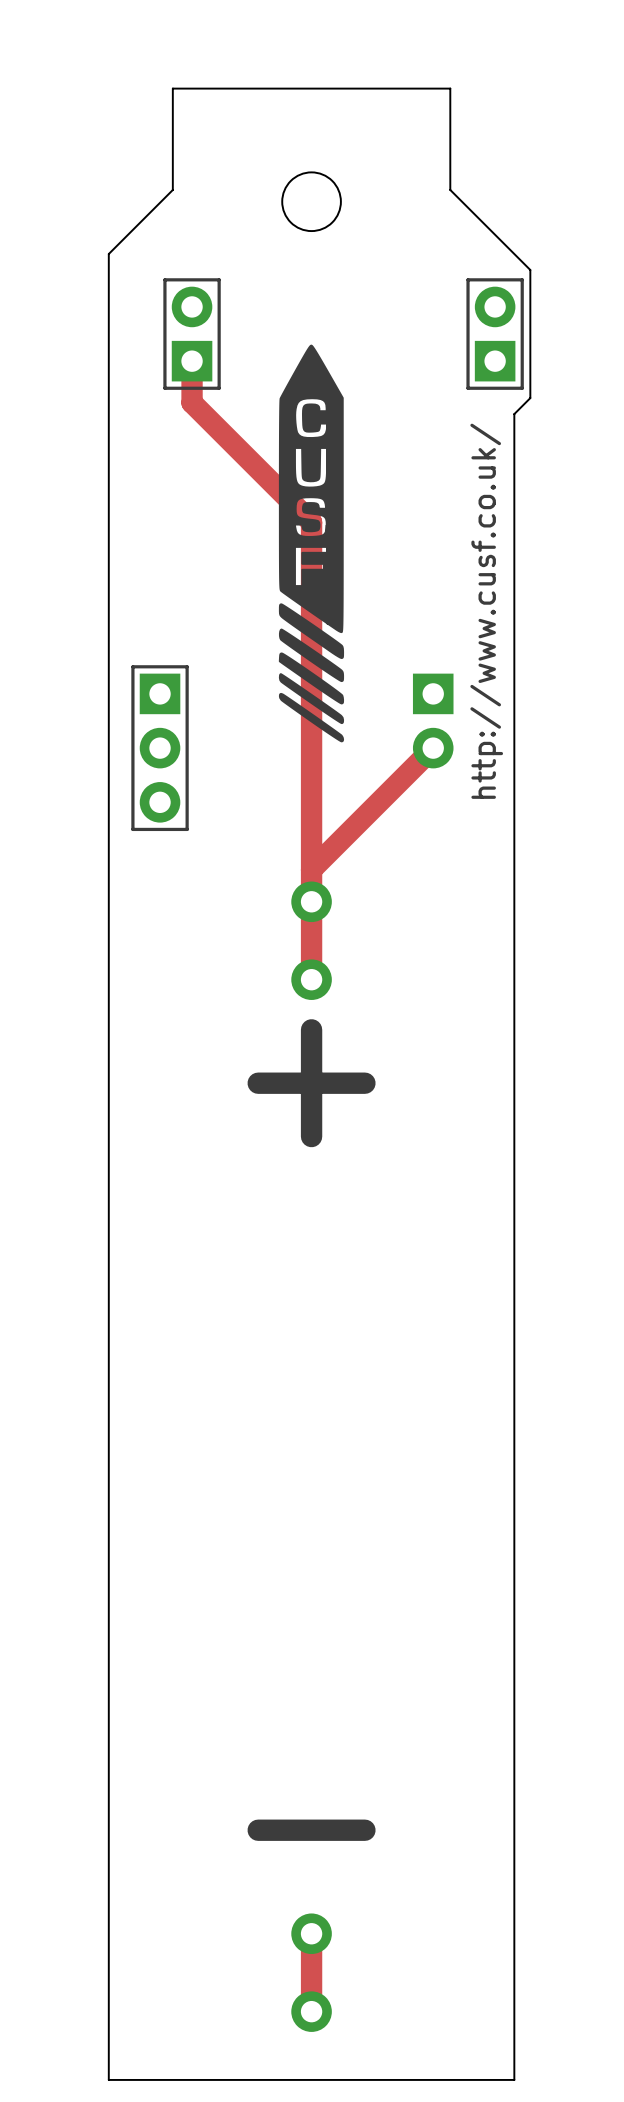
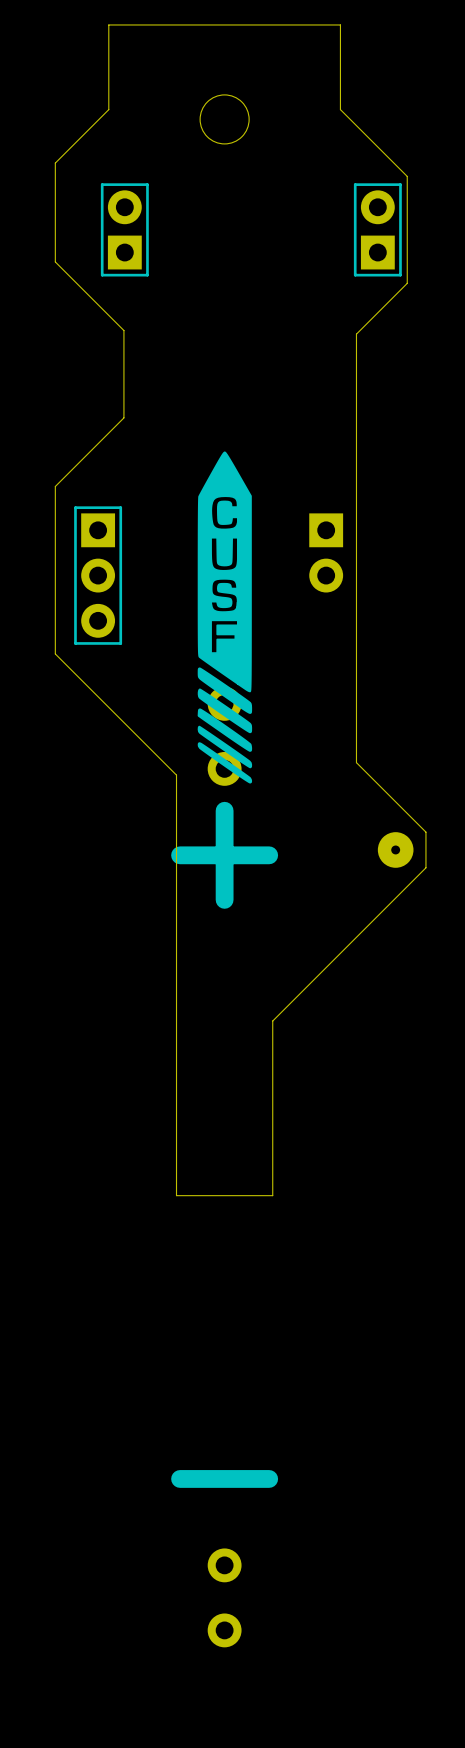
top track: (192, 361) (192, 402) (311, 522) (311, 979) -> none
board edge: (108, 372) (108, 641) -> (55, 261) (123, 330) (123, 417) (55, 486)
board edge: (514, 414) (514, 2079) (108, 2079) (108, 842) -> (393, 296) (356, 334) (356, 762) (425, 832) (425, 867) (272, 1021) (272, 1195) (176, 1195) (176, 775) (55, 653)
drawing position: (311, 543) -> (224, 617)
text: http://www.cusf.co.uk/ (486, 611) -> none
top track: (433, 748) (311, 869) -> none
part: none -> (395, 849)
top track: (311, 1933) (311, 2011) -> none

